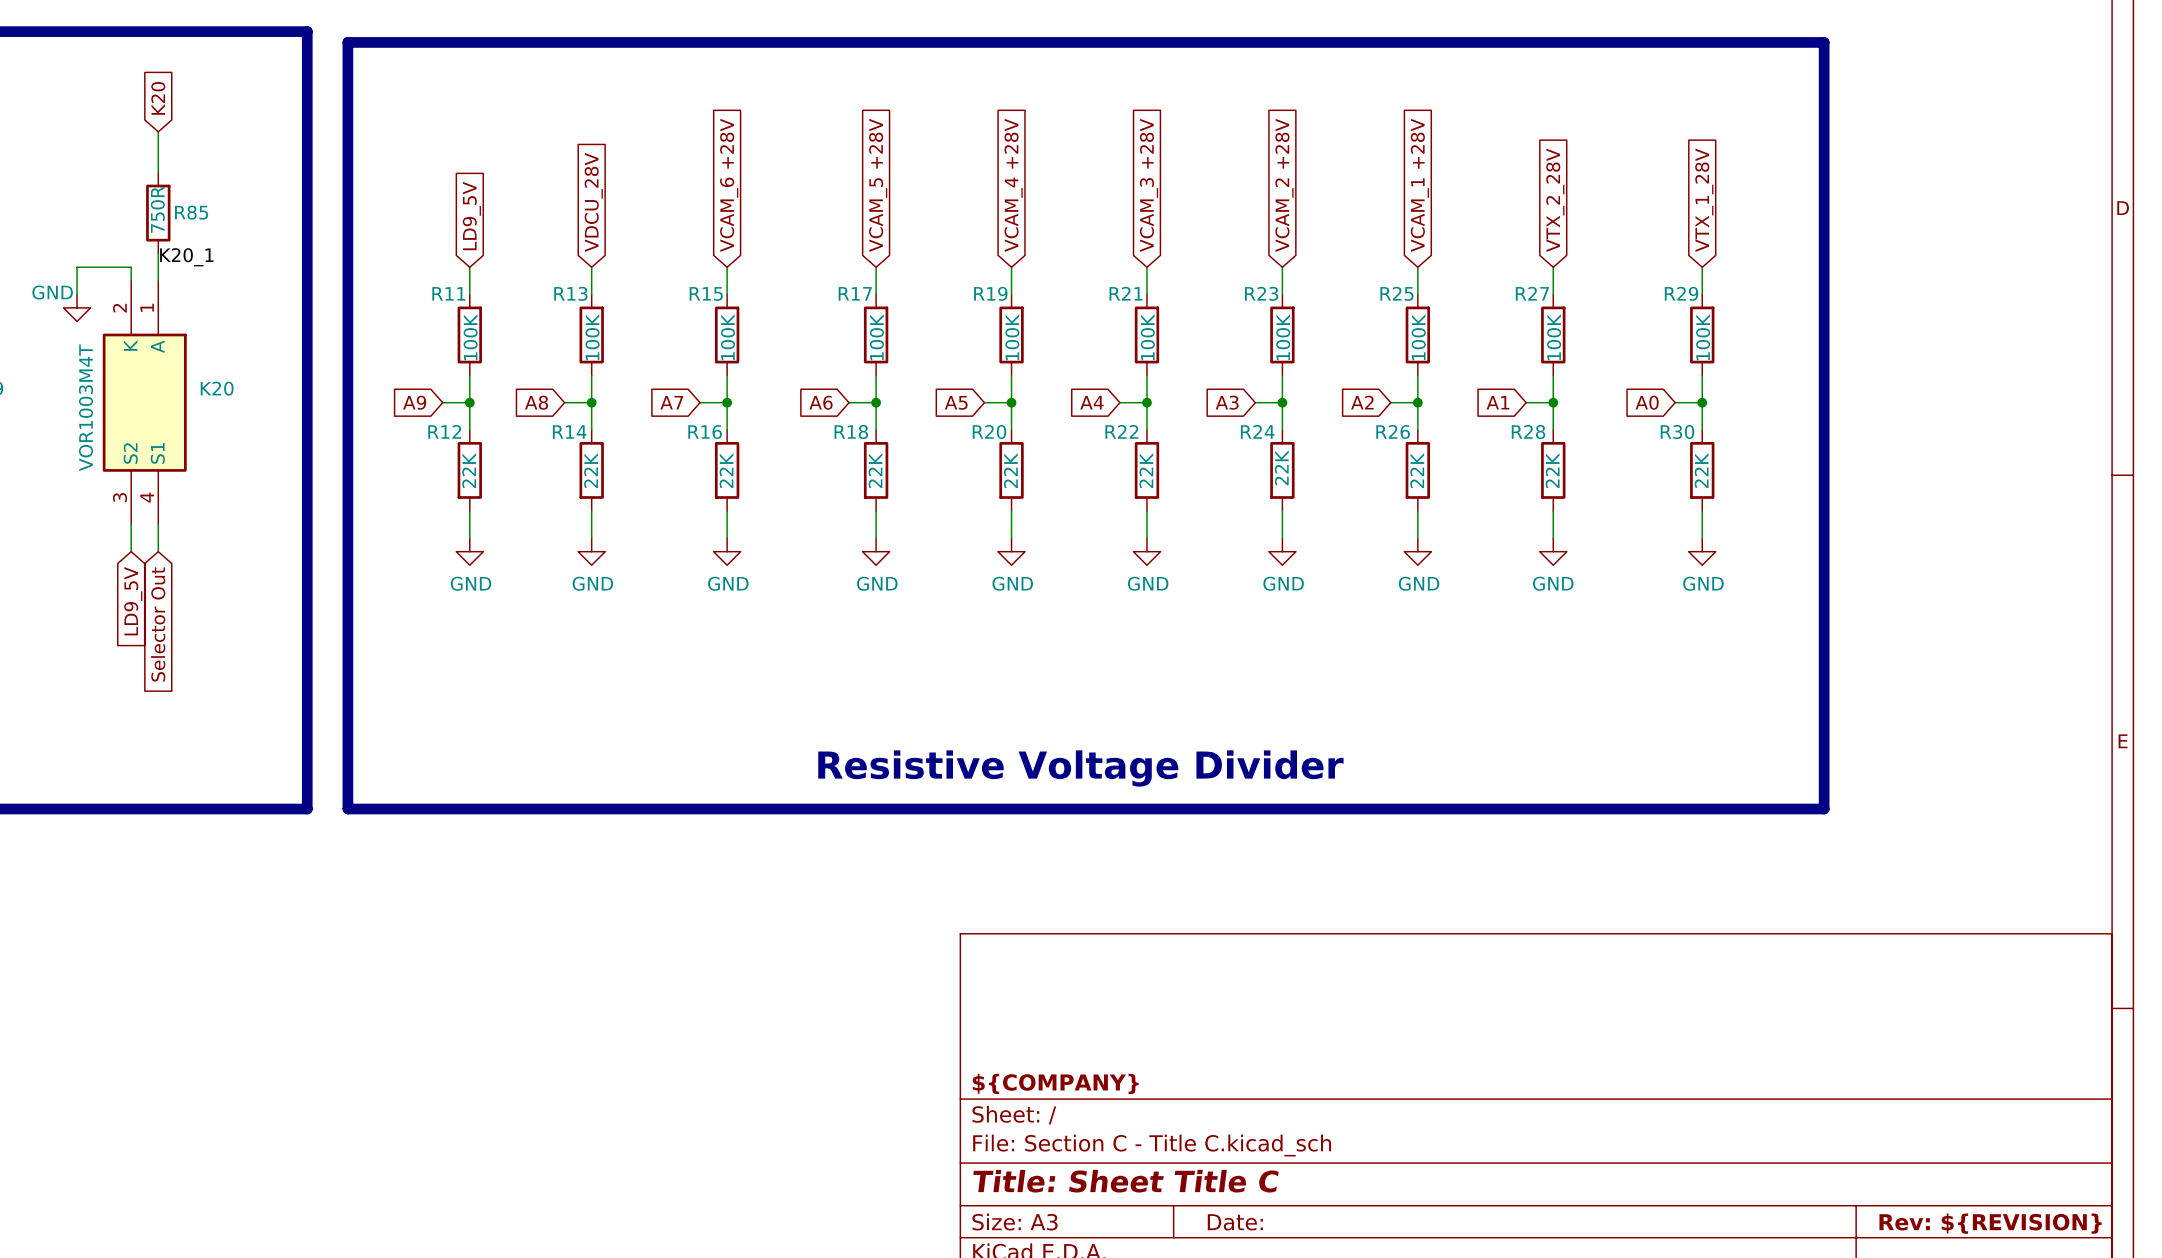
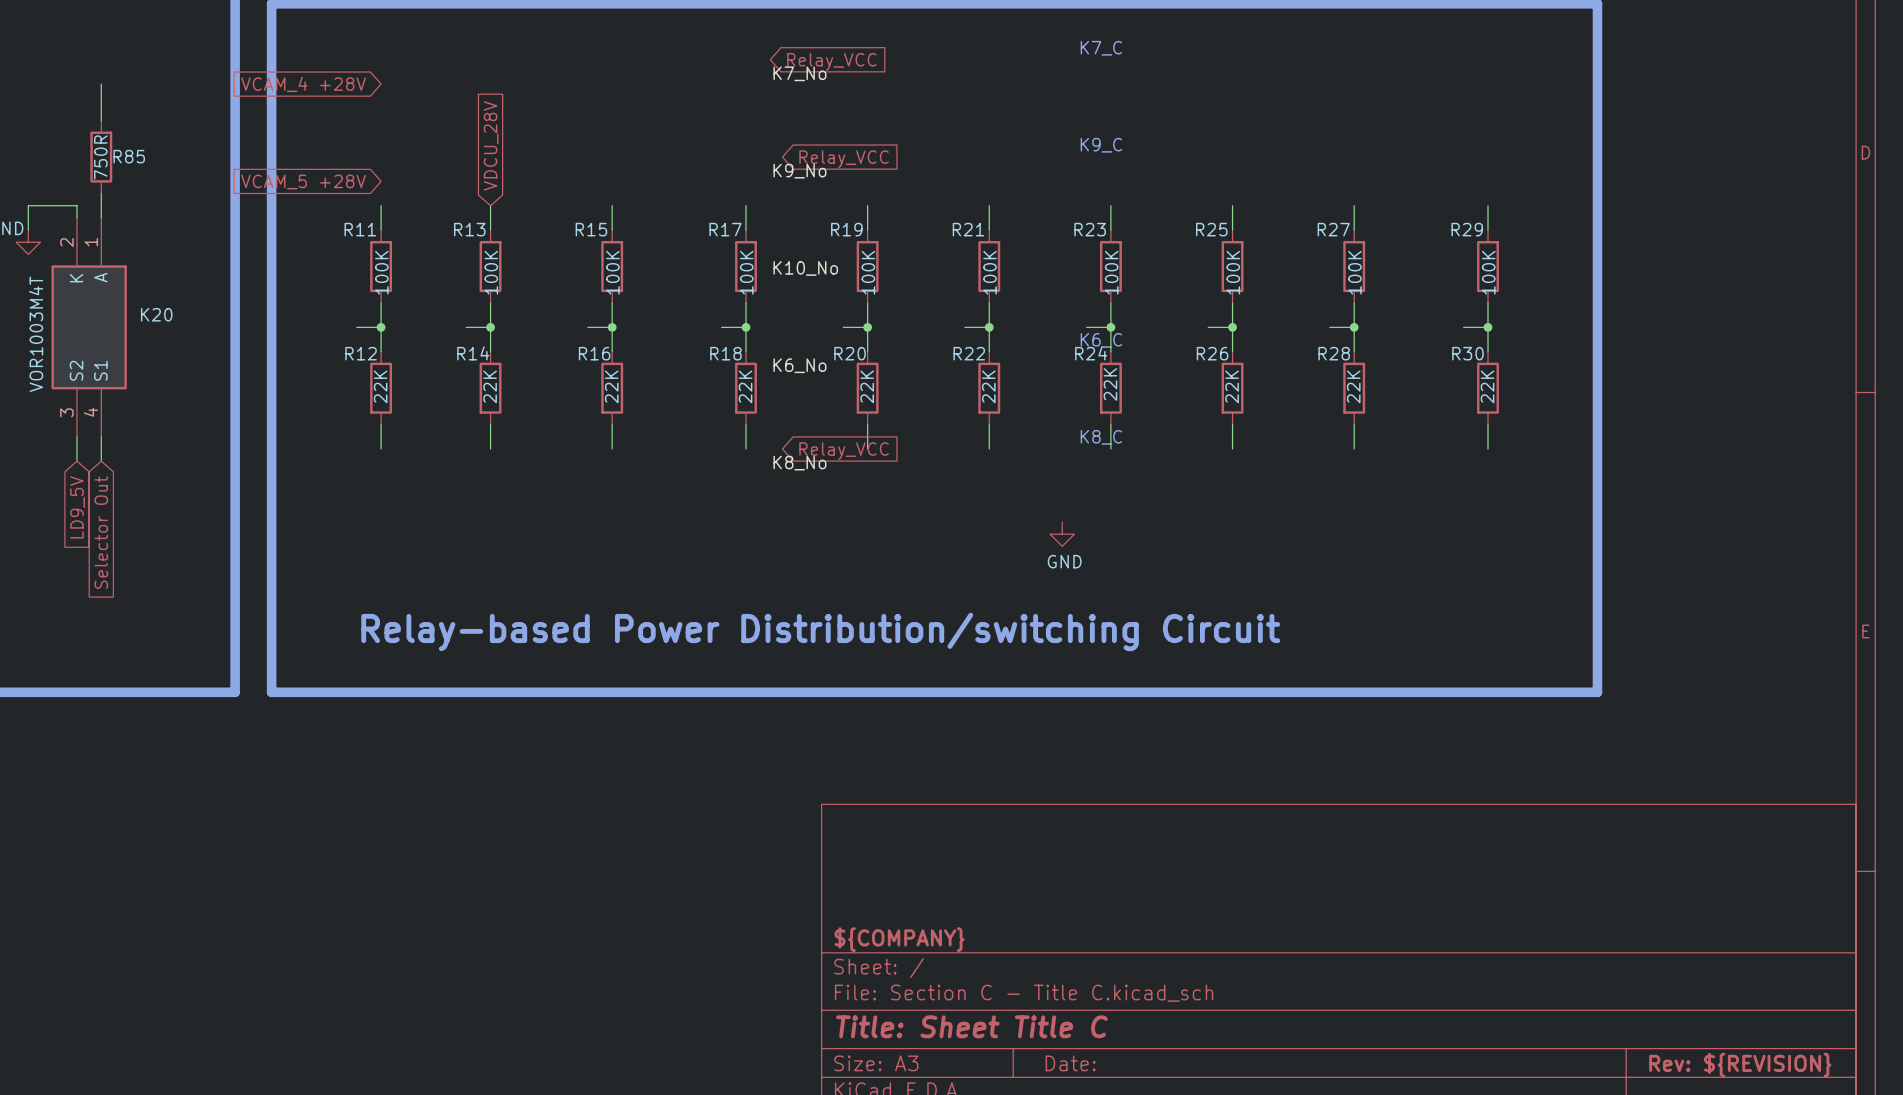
text: none -> K7_C (1101, 48)
global label: K20 (158, 98) -> none
global label: none -> Relay_VCC (831, 61)
label: none -> K7_No (799, 73)
global label: none -> VCAM_4 +28V (303, 84)
global label: VCAM_6 +28V (729, 185) -> none
global label: VCAM_5 +28V (878, 185) -> none
global label: VCAM_4 +28V (1013, 185) -> none
global label: VCAM_3 +28V (1149, 185) -> none
global label: VCAM_2 +28V (1284, 185) -> none
global label: VCAM_1 +28V (1419, 185) -> none
global label: VTX_2_28V (1555, 200) -> none
global label: VTX_1_28V (1704, 200) -> none
text: none -> K9_C (1101, 145)
global label: none -> Relay_VCC (844, 159)
global label: LD9_5V (471, 216) -> none
label: none -> K9_No (799, 171)
global label: none -> VCAM_5 +28V (303, 181)
label: K20_1 (186, 257) -> none
label: none -> K10_No (805, 268)
global label: A9 (414, 402) -> none
global label: A8 (536, 402) -> none
global label: A7 (671, 402) -> none
global label: A6 (821, 402) -> none
global label: A5 (956, 402) -> none
global label: A4 (1091, 402) -> none
global label: A3 (1227, 402) -> none
global label: A2 (1362, 402) -> none
global label: A1 (1497, 402) -> none
global label: A0 (1647, 402) -> none
text: none -> K6_C (1101, 340)
label: none -> K6_No (799, 365)
text: none -> K8_C (1101, 437)
global label: none -> Relay_VCC (844, 451)
power symbol: GND (469, 551) -> none
power symbol: GND (591, 551) -> none
power symbol: GND (727, 551) -> none
power symbol: GND (876, 551) -> none
power symbol: GND (1011, 551) -> none
power symbol: GND (1146, 551) -> none
power symbol: GND (1282, 551) -> none
power symbol: GND (1417, 551) -> none
power symbol: GND (1553, 551) -> none
power symbol: GND (1702, 551) -> none
label: none -> K8_No (799, 463)
power symbol: none -> GND (1062, 534)
text: none -> Relay-based Power Distribution/switching Circuit (820, 631)
text: Resistive Voltage Divider (1080, 768) -> none

